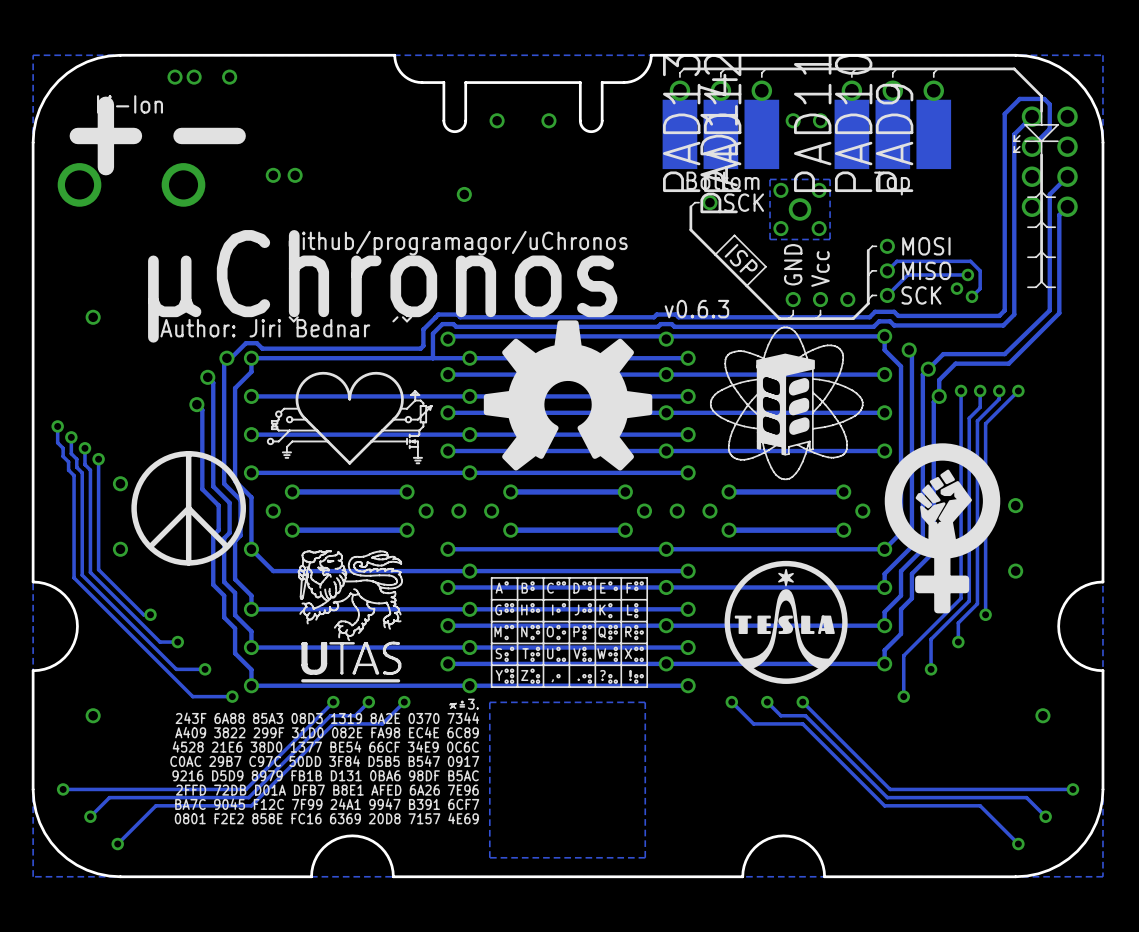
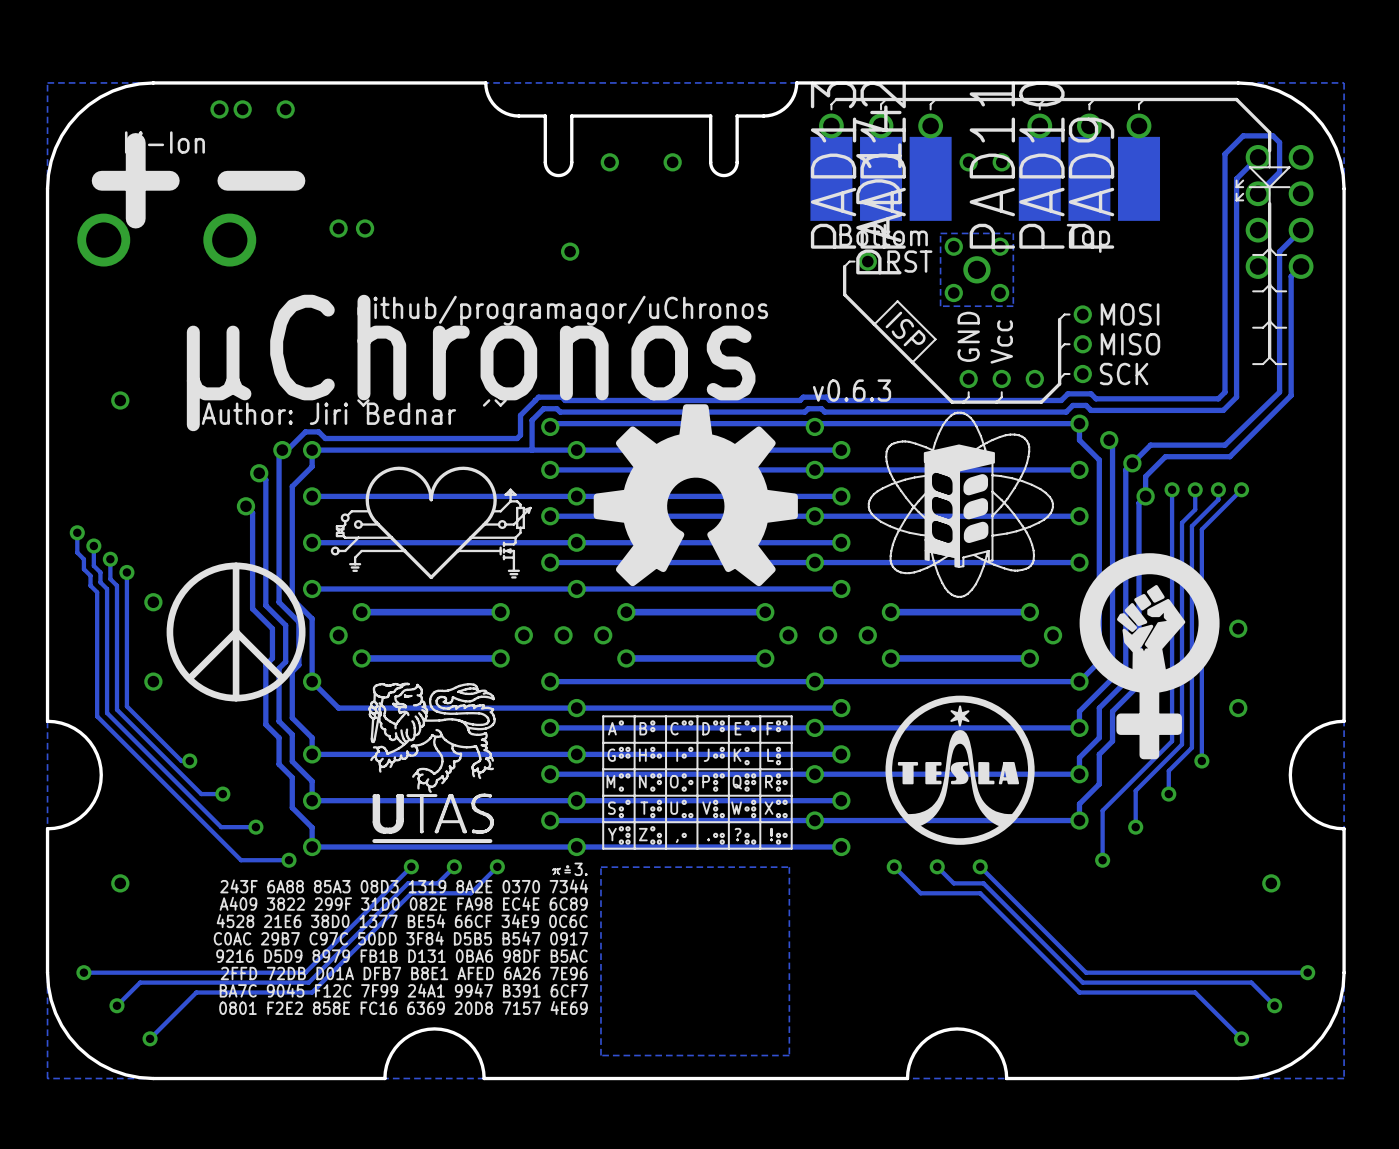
text: SCK (744, 202) -> RST (909, 261)
track: (887, 270) (896, 261) (970, 261) (980, 270) (980, 288) (971, 296) -> none
track: (967, 274) (907, 274) (887, 295) -> none
via: (967, 274) -> none
via: (956, 288) -> none
via: (971, 296) -> none

